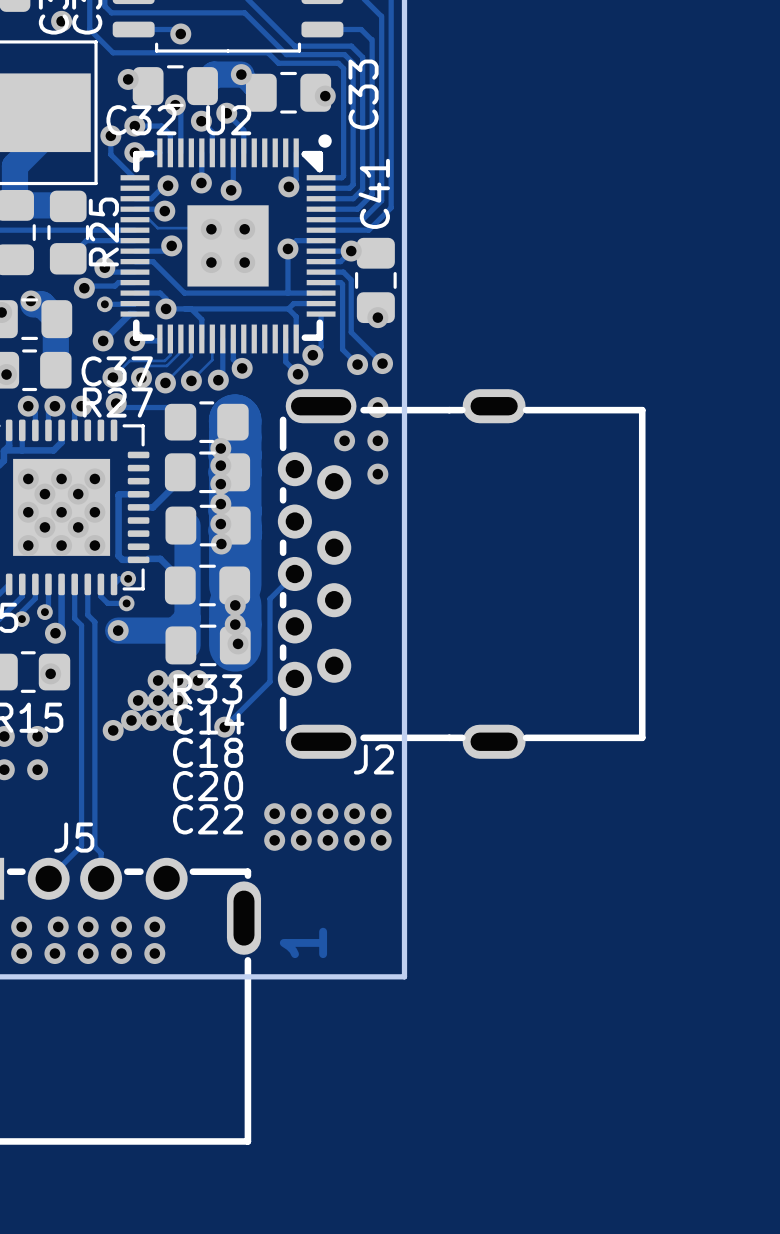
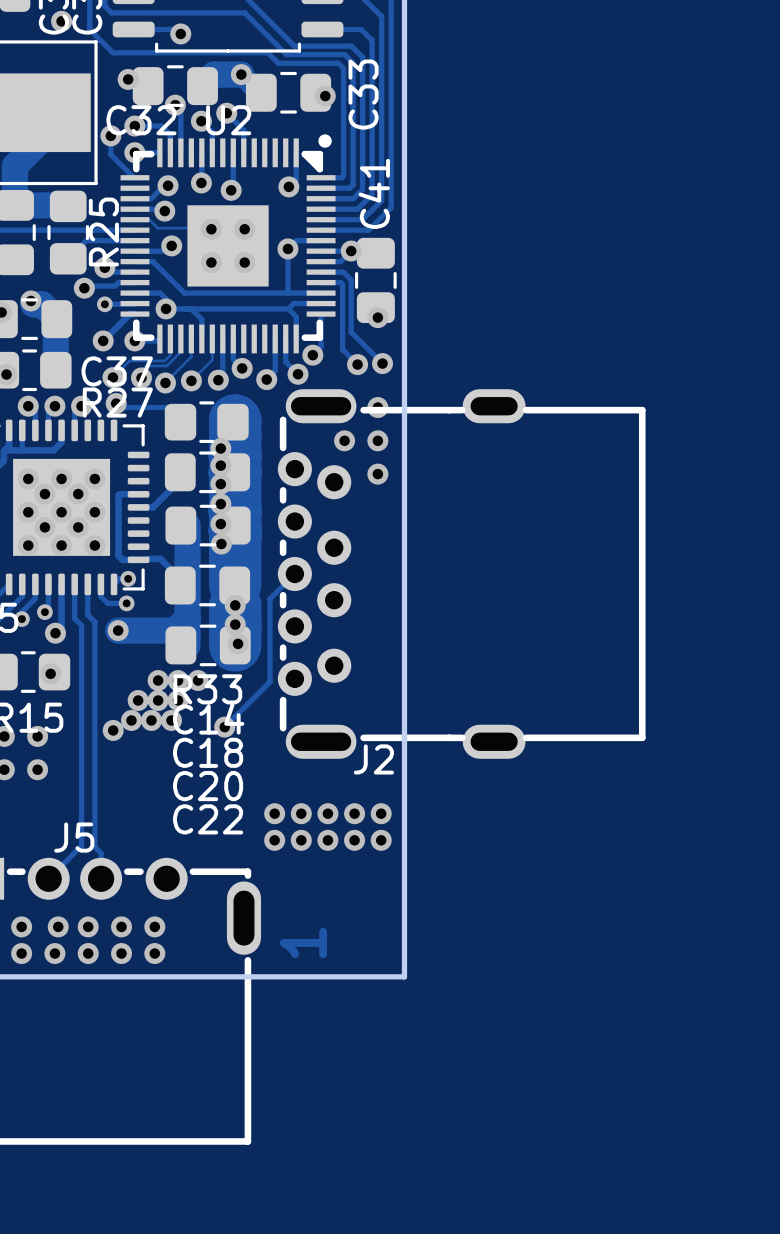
track: none -> (275, 338) (275, 371) (266, 379)
via: none -> (266, 379)

